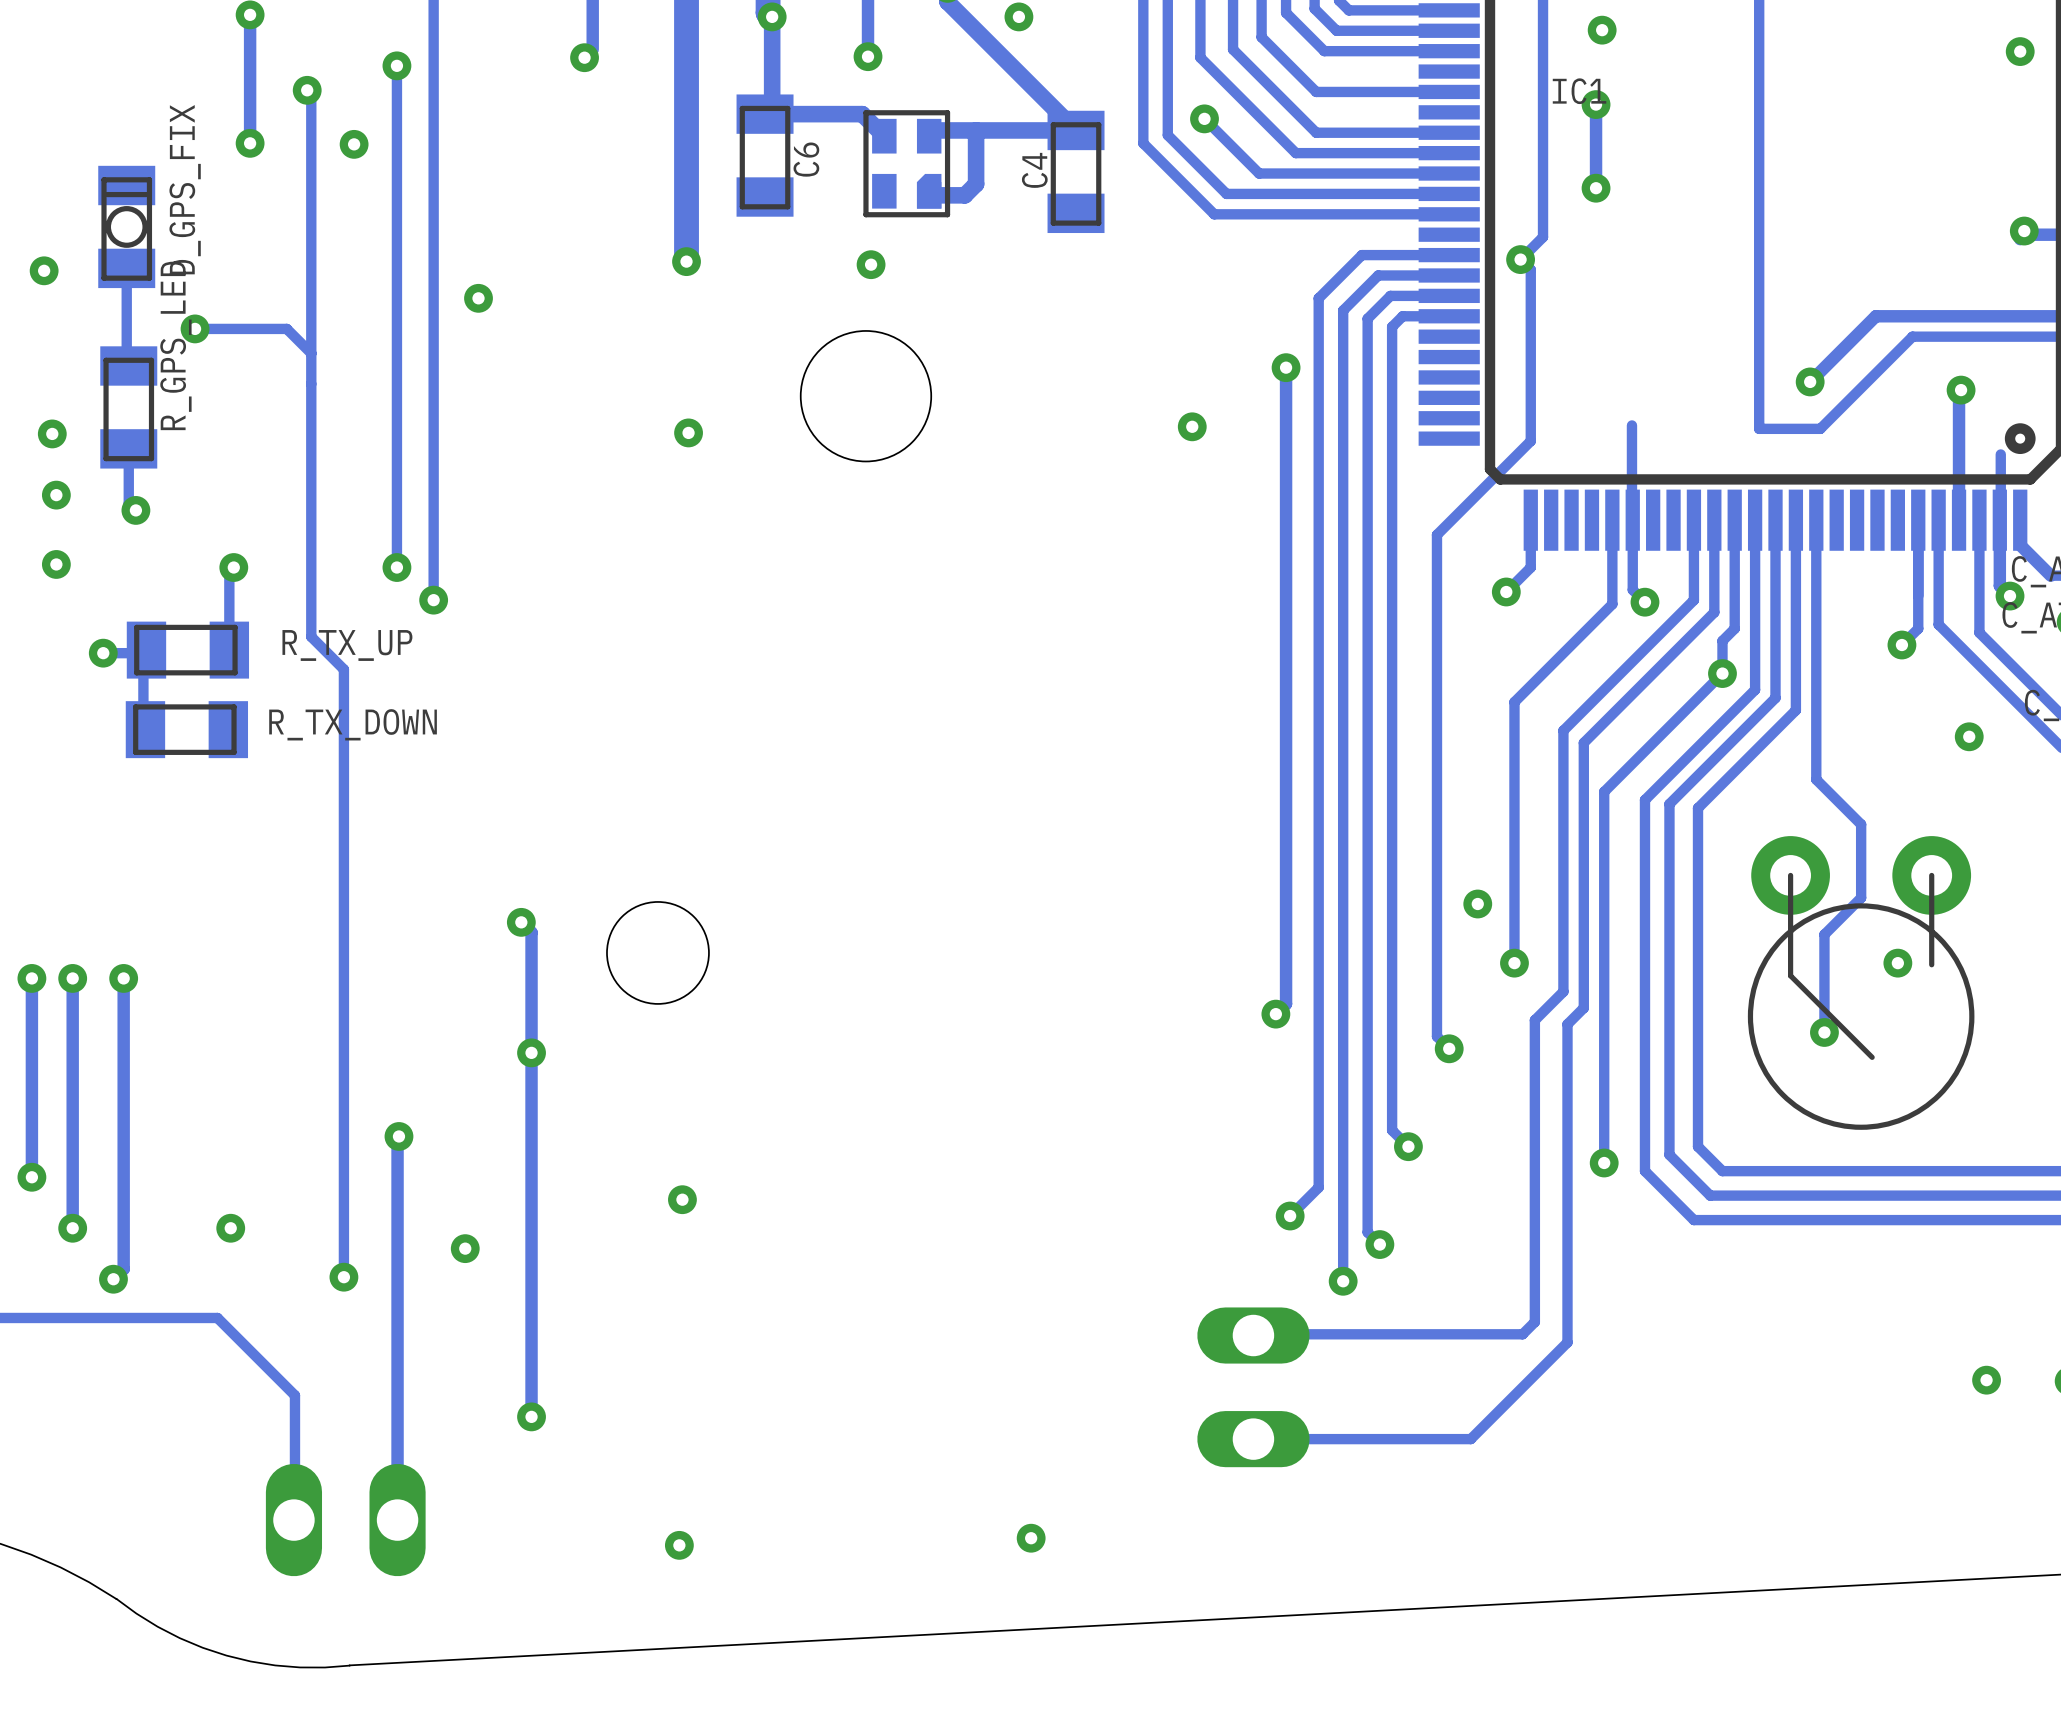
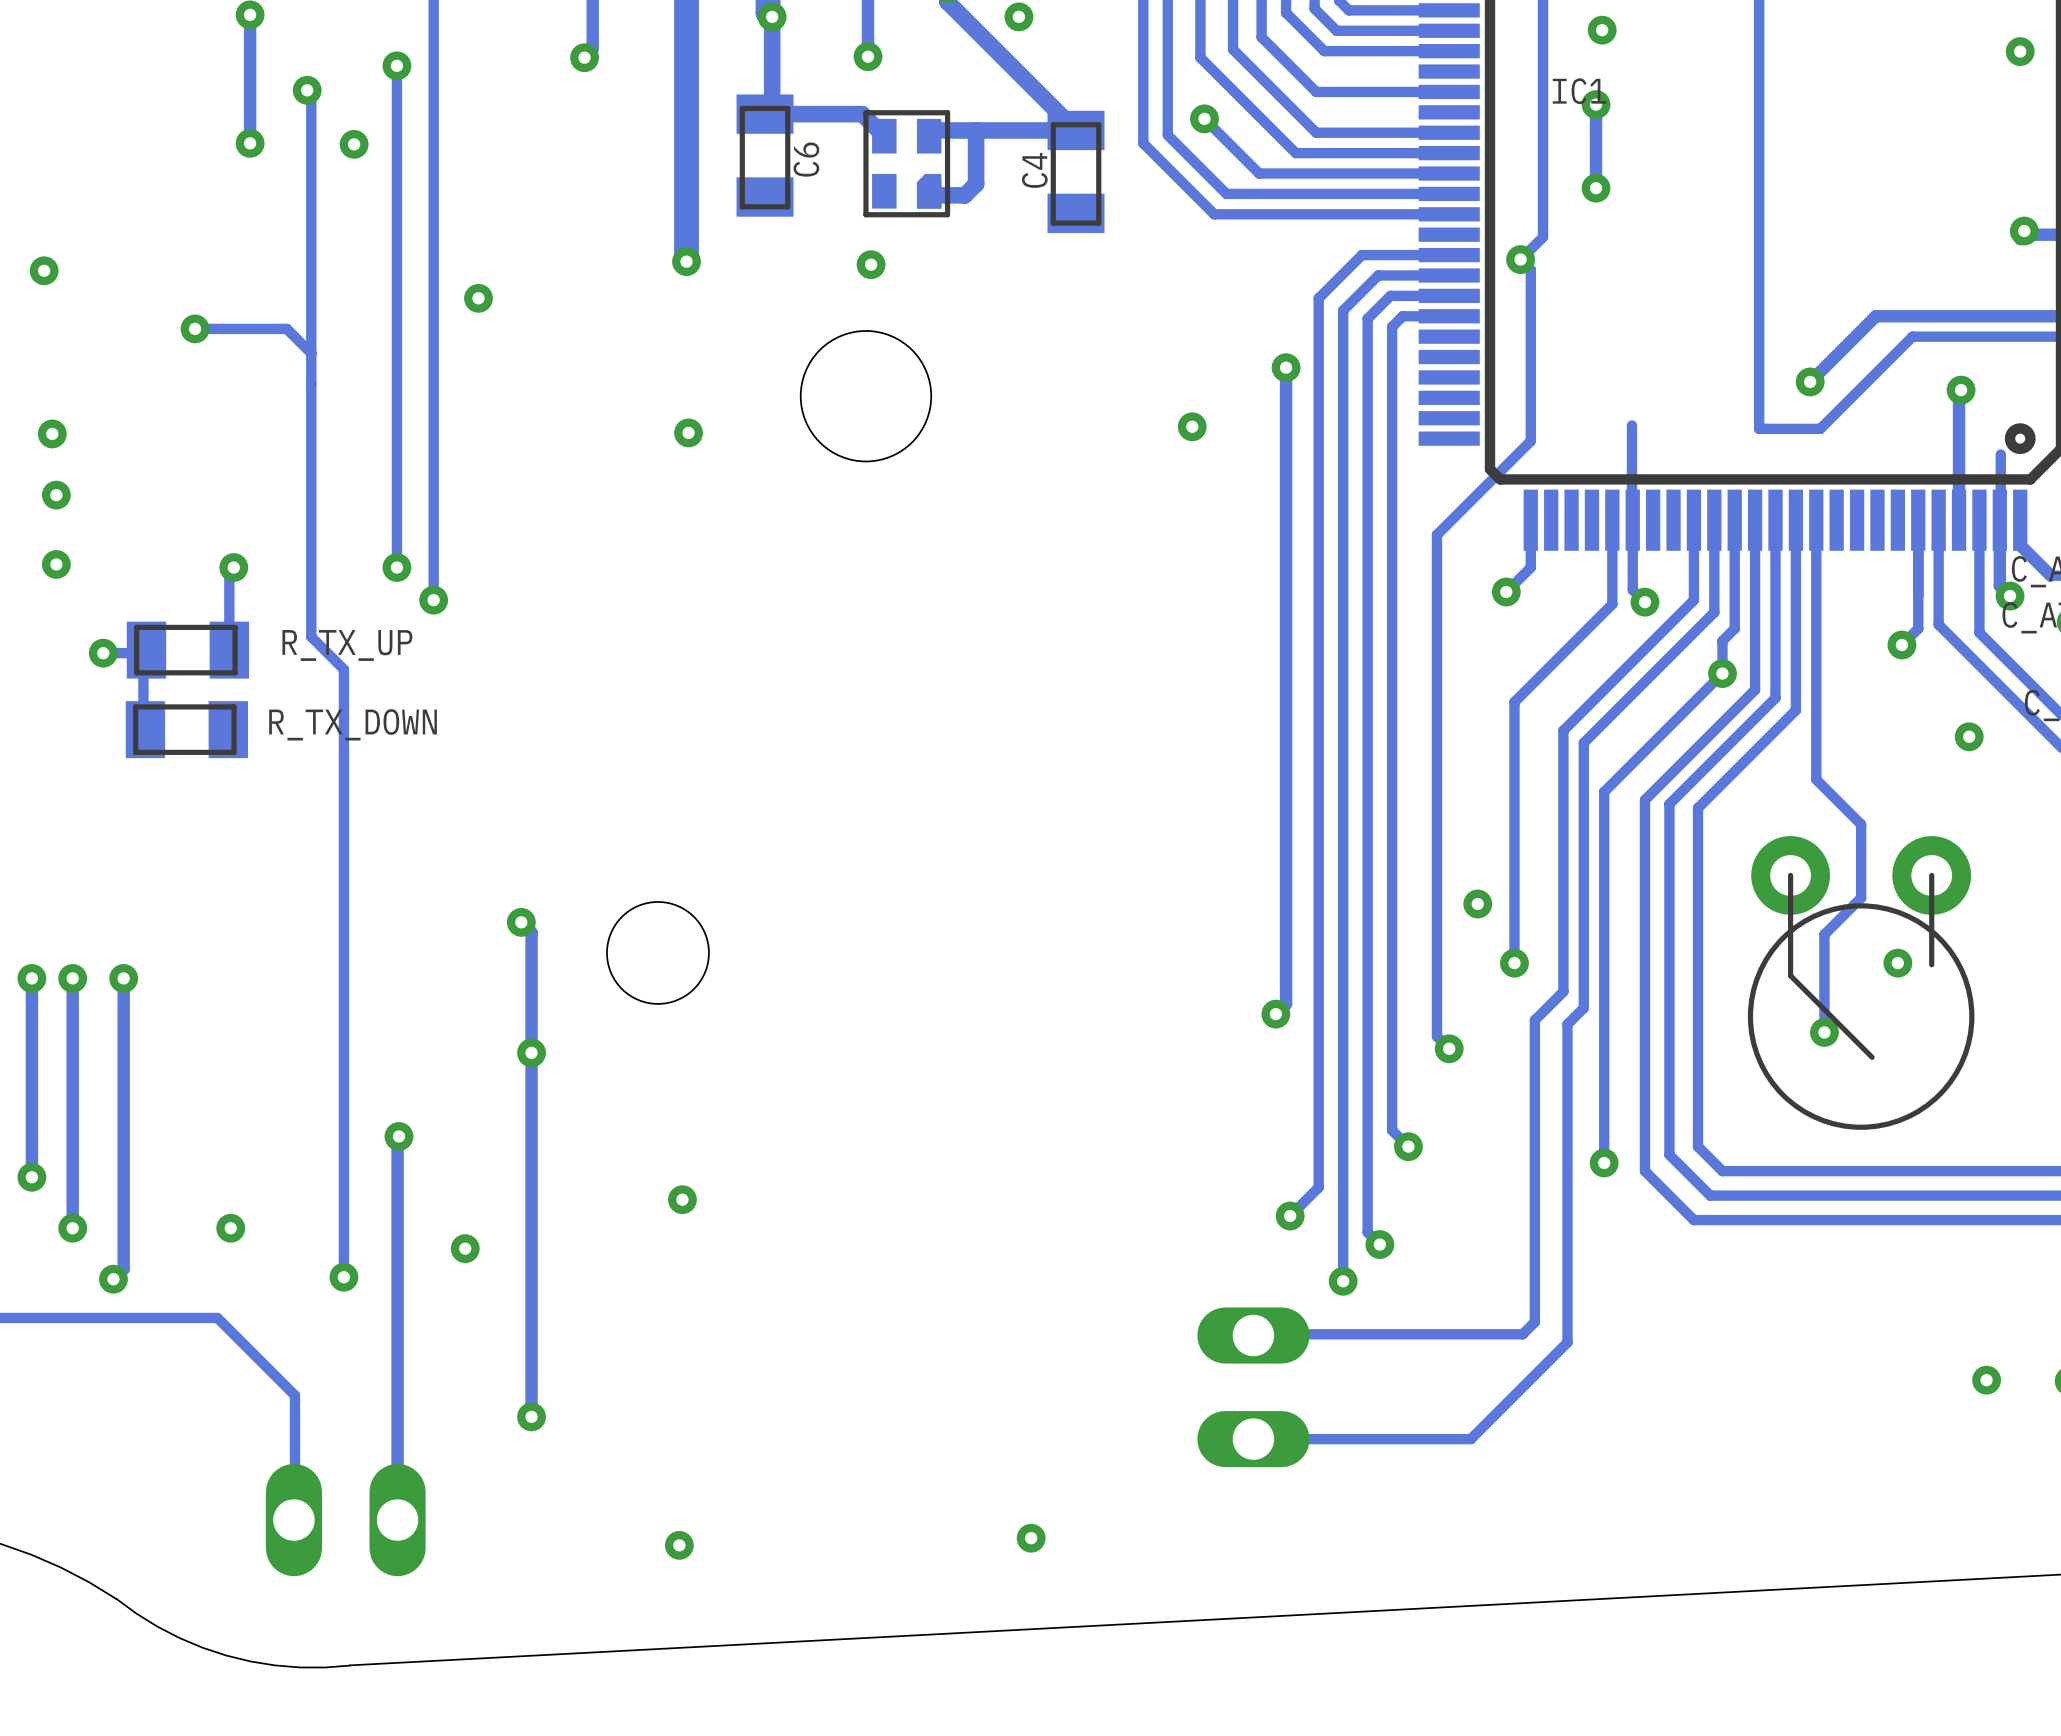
D_GPS_FIX: (126, 226) -> none
track: (126, 268) (126, 363) (128, 365) -> none
R_GPS_LED: (128, 407) -> none
track: (128, 448) (128, 503) (135, 510) -> none
via: (135, 510) -> none

